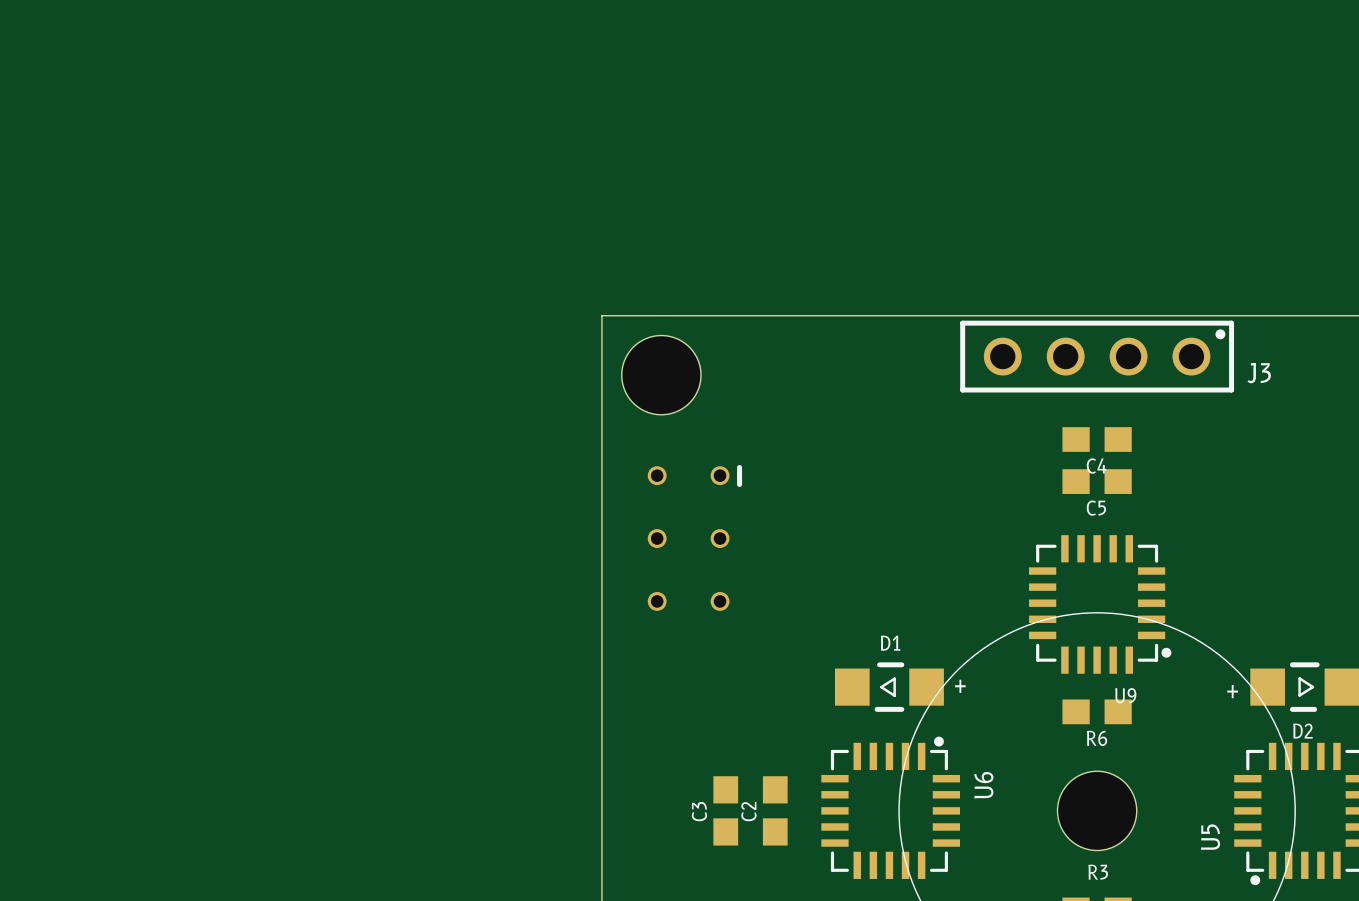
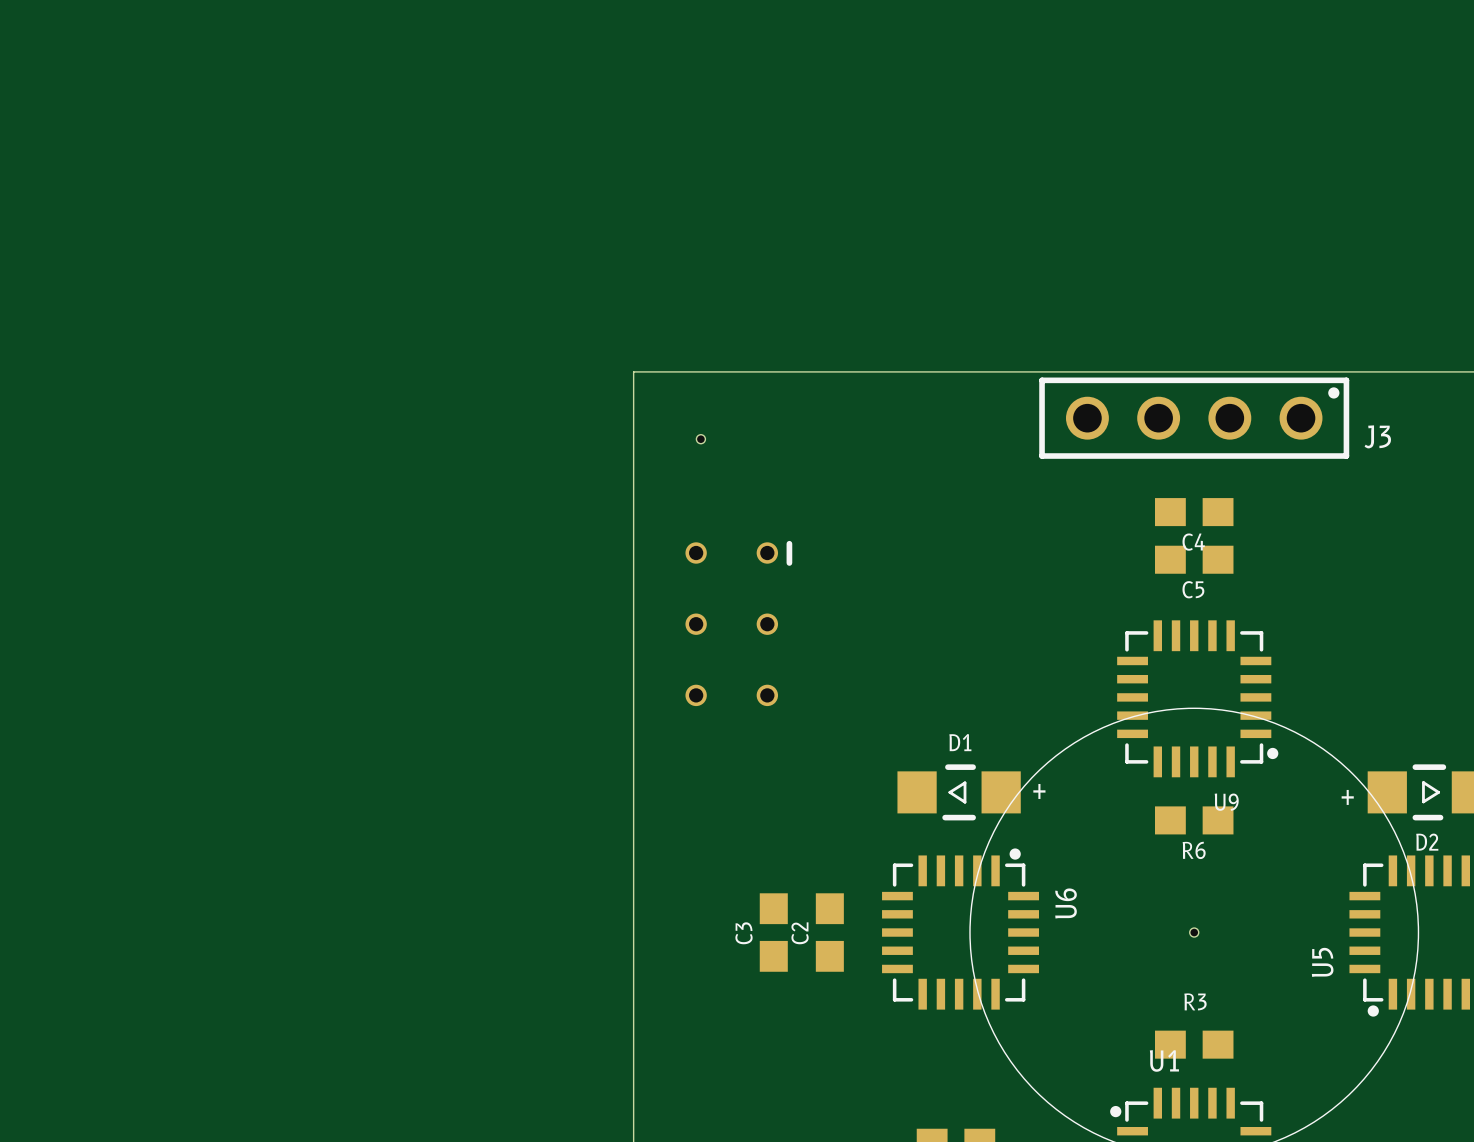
part: (661, 375) -> none
hole: none -> (700, 439)
part: (1097, 810) -> none
hole: none -> (1194, 932)

